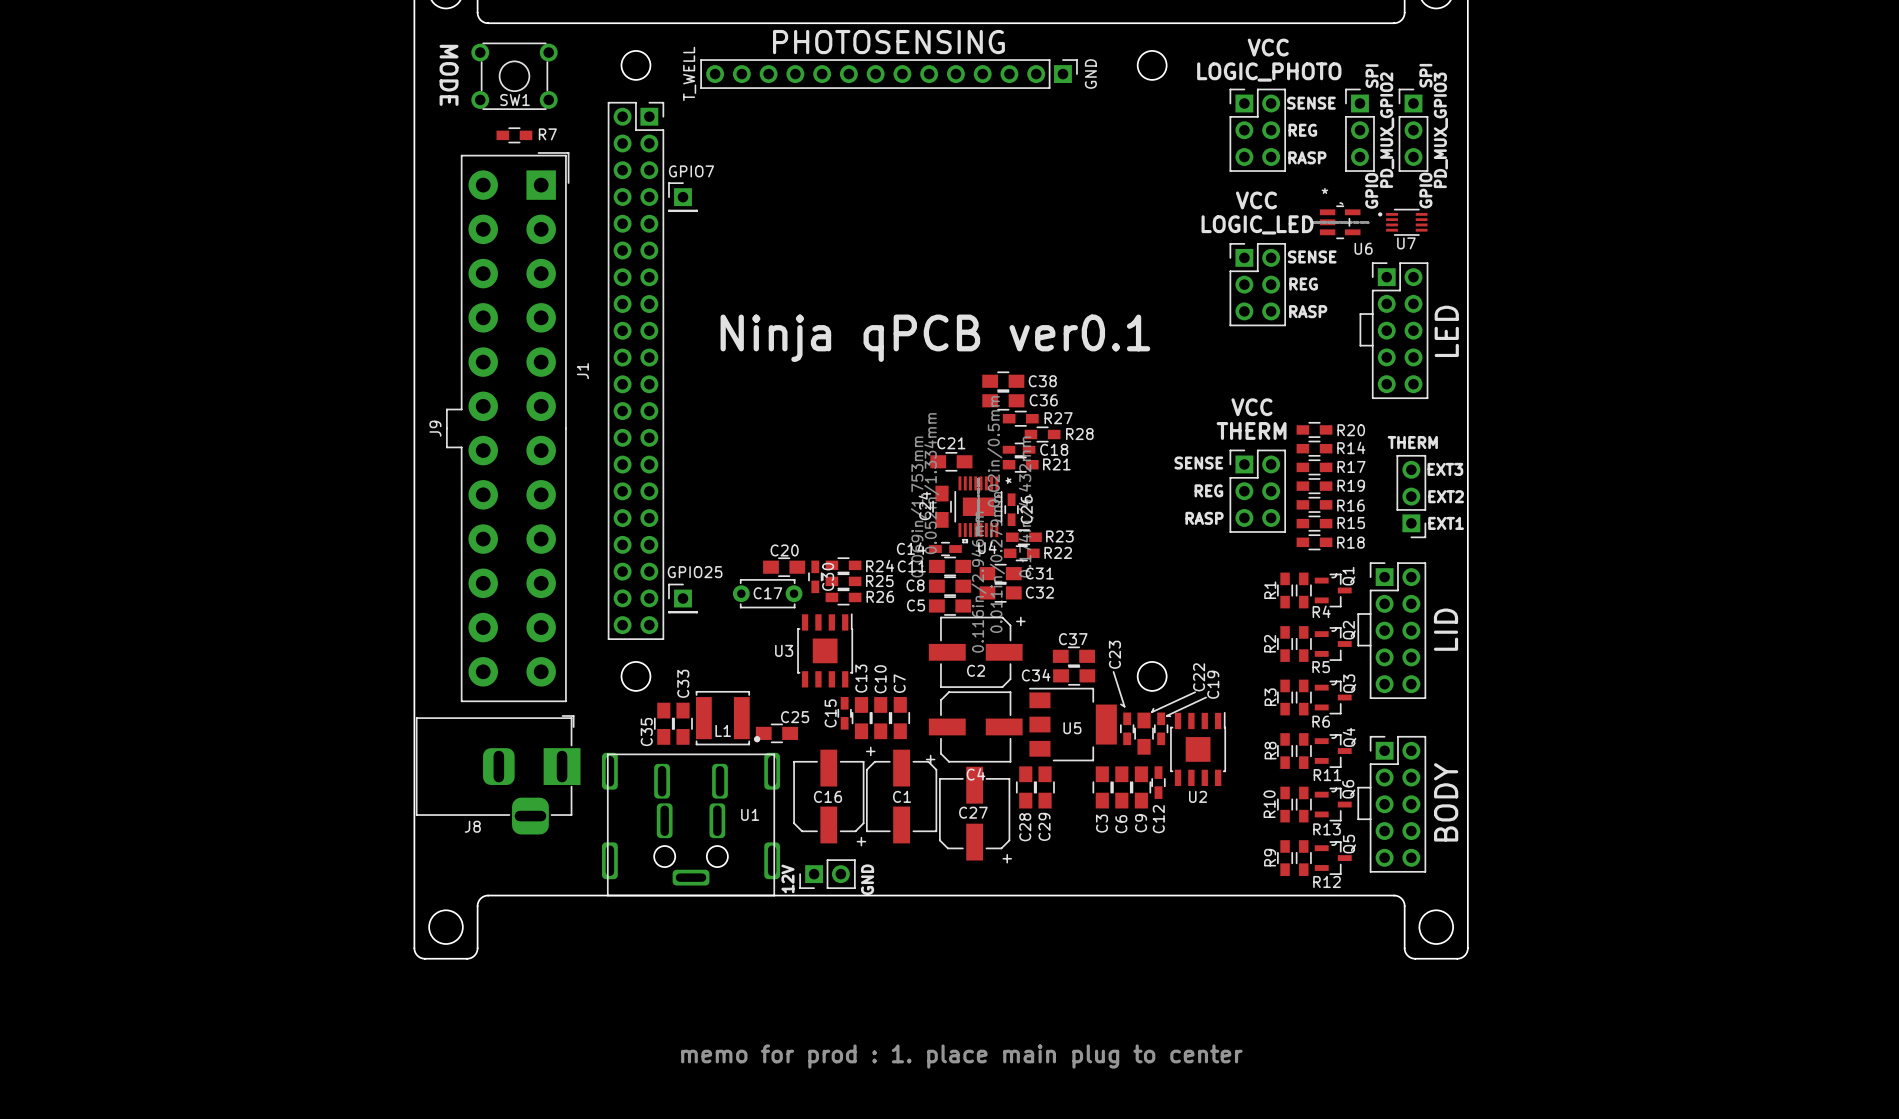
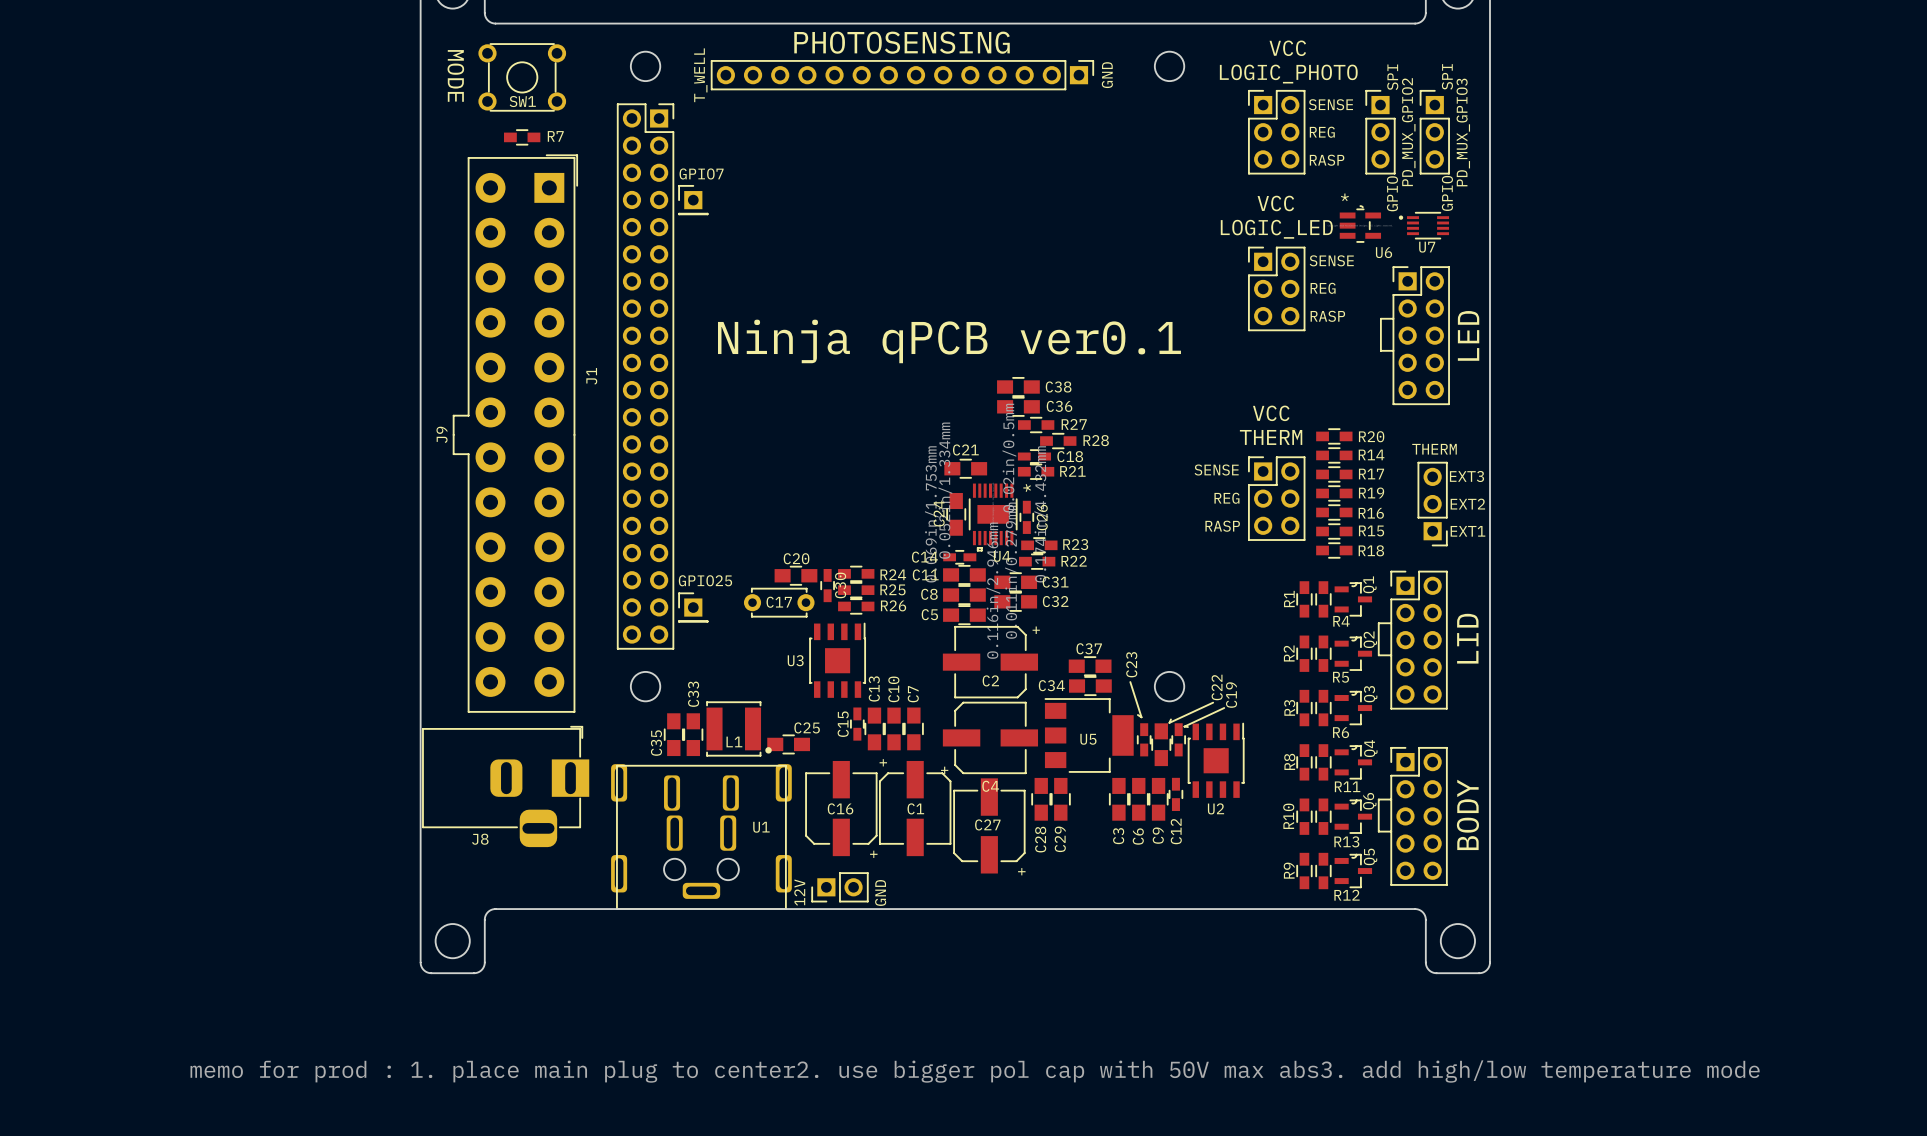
text: memo for prod : 1. place main plug to center (961, 1056) -> memo for prod : 1. place main plug to center 2. use bigger pol cap with 50V max abs 3. add high/low temperature mode (975, 1071)

